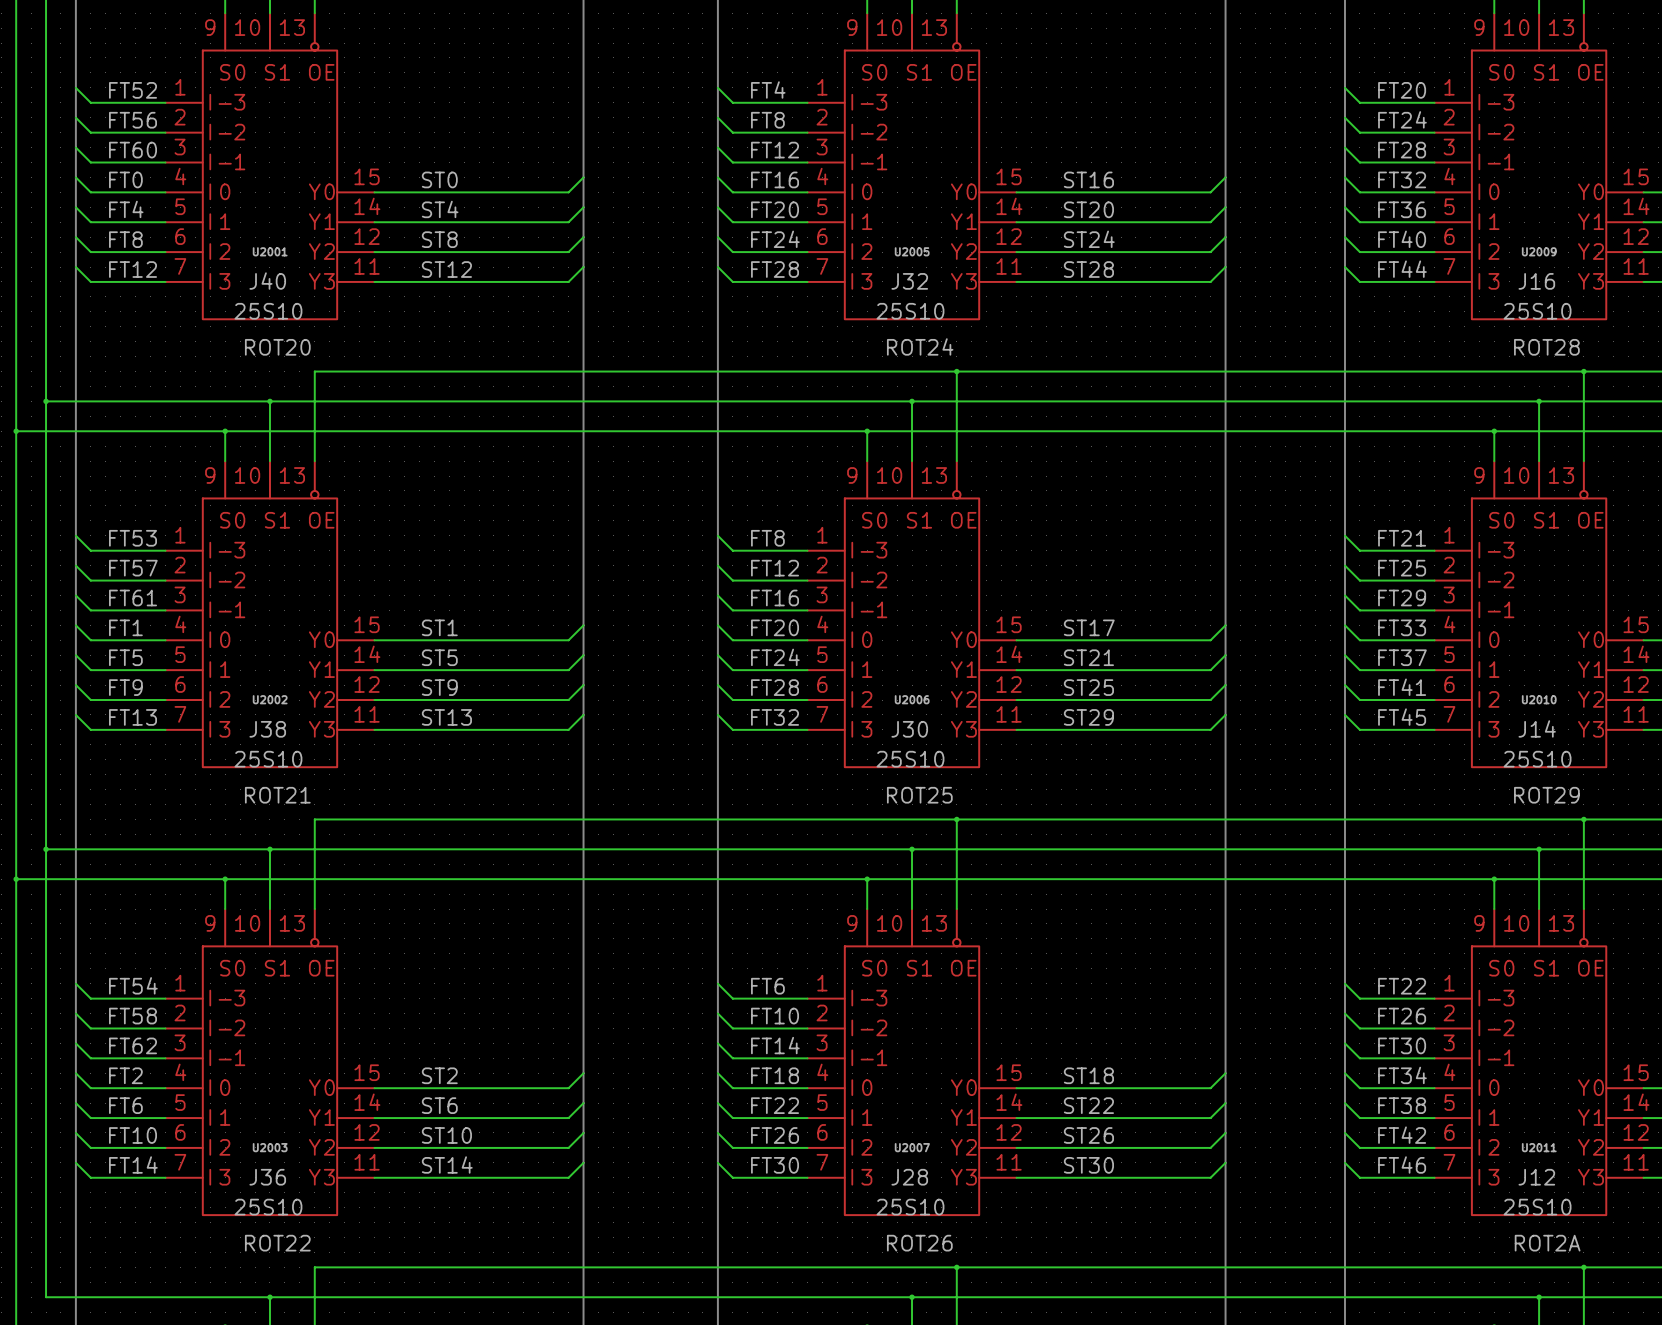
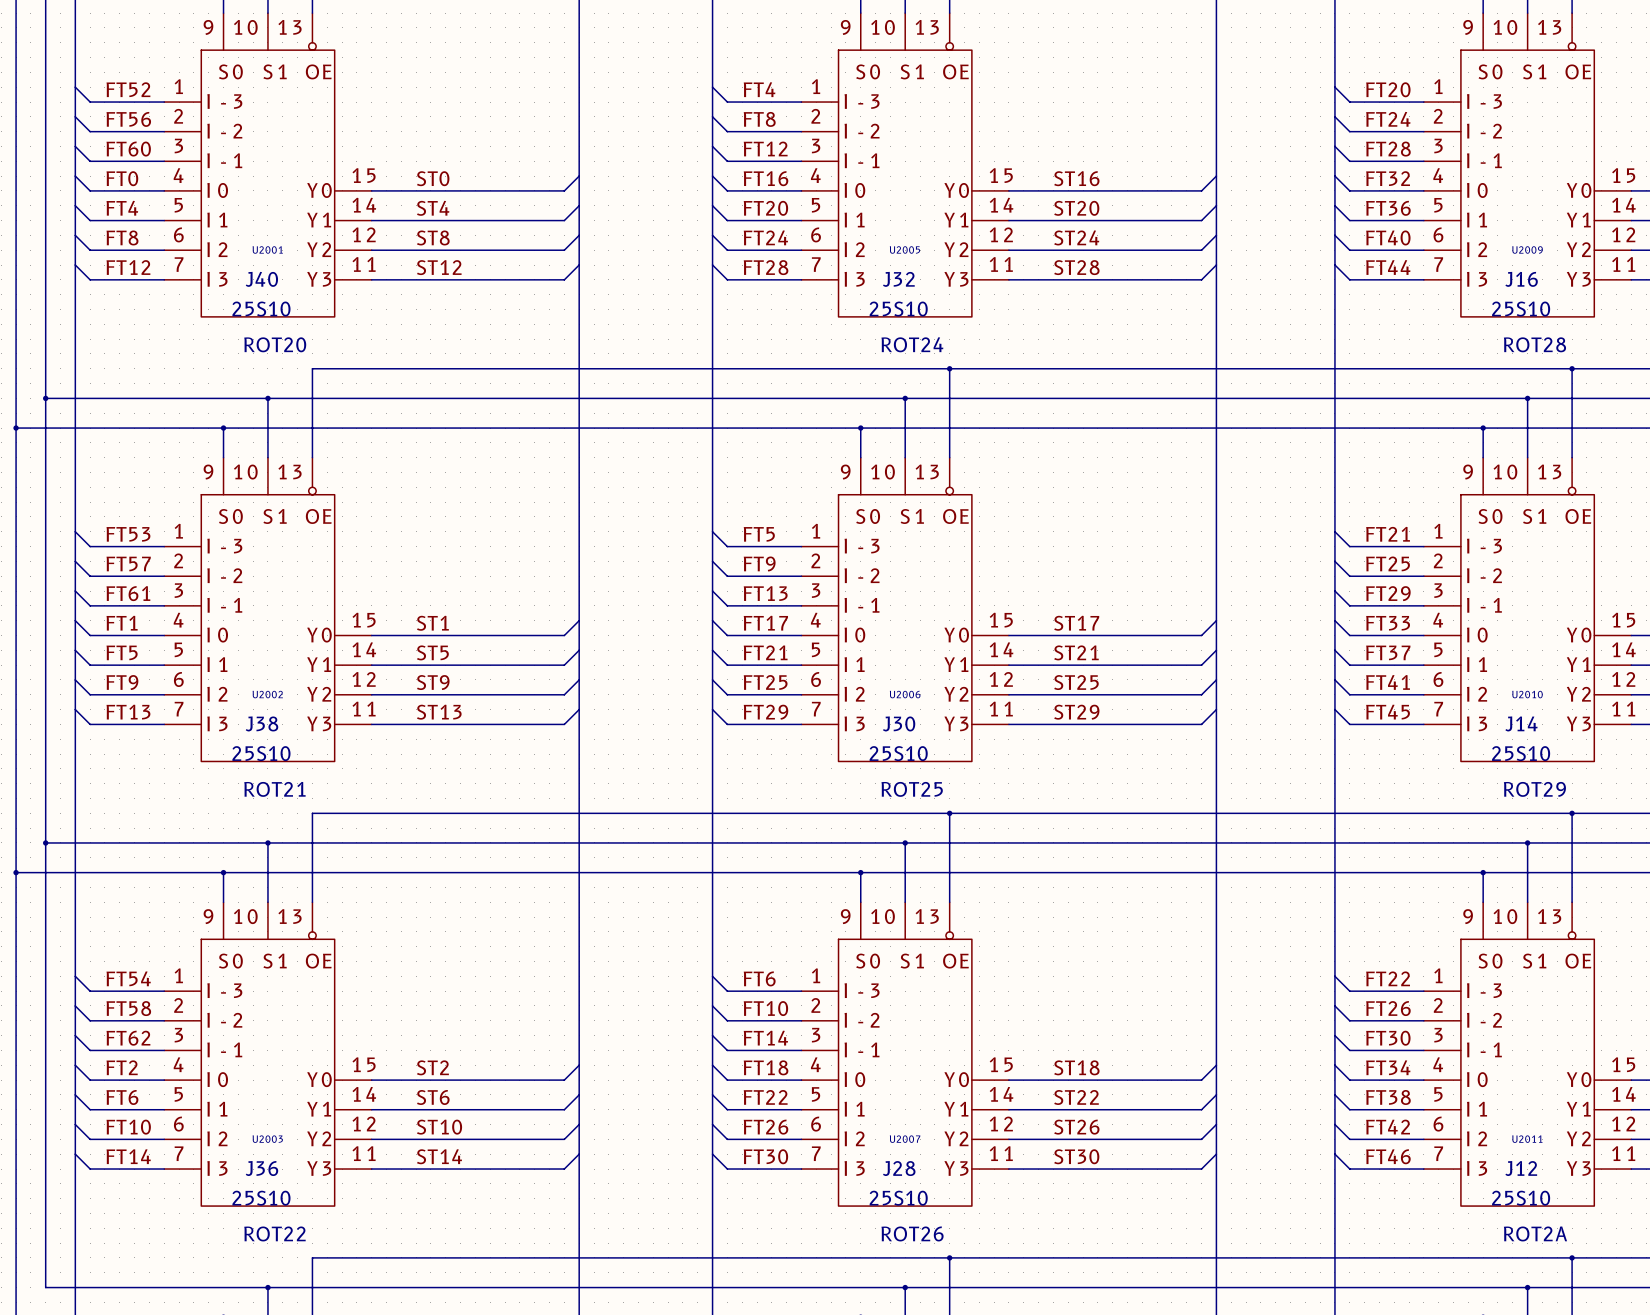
label: FT8 (767, 538) -> FT5 (759, 534)
label: FT12 (775, 568) -> FT9 (759, 563)
label: FT16 (775, 597) -> FT13 (765, 593)
label: FT20 (775, 627) -> FT17 (765, 623)
label: FT24 (775, 657) -> FT21 (765, 652)
label: FT28 (775, 687) -> FT25 (765, 682)
label: FT32 (775, 717) -> FT29 (765, 712)

